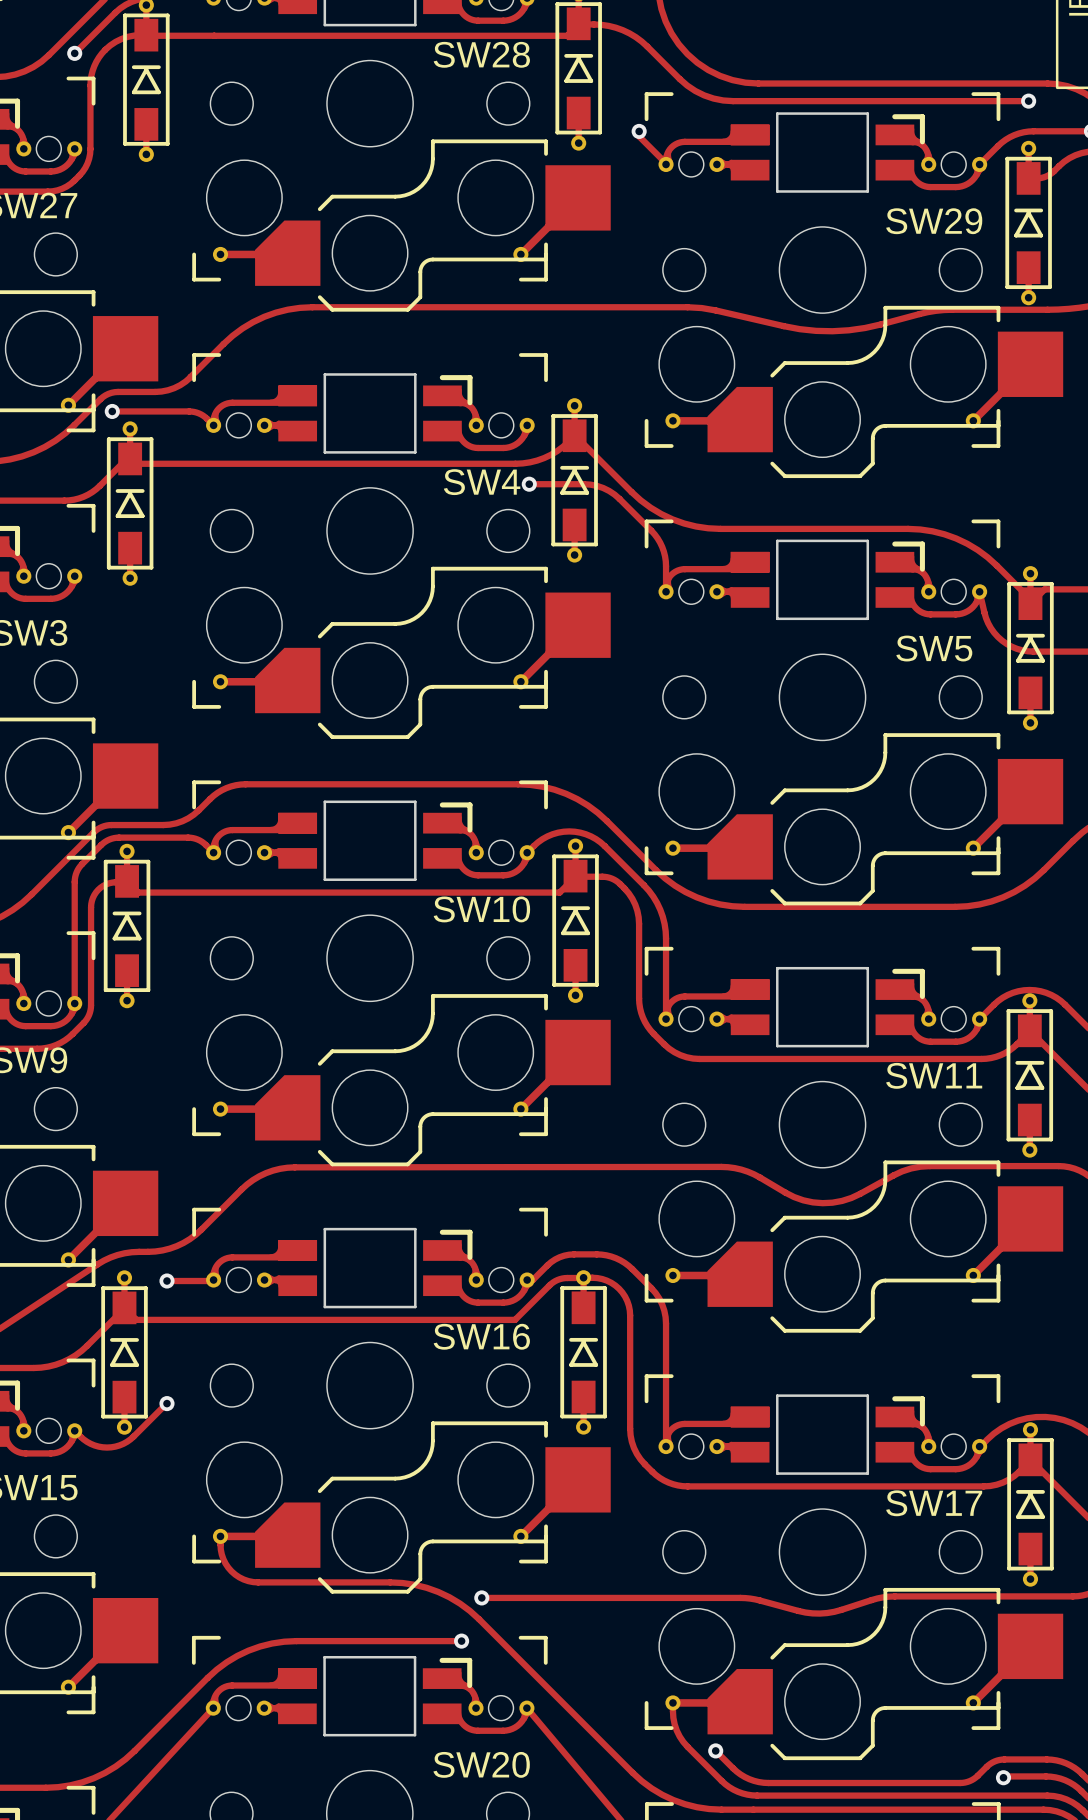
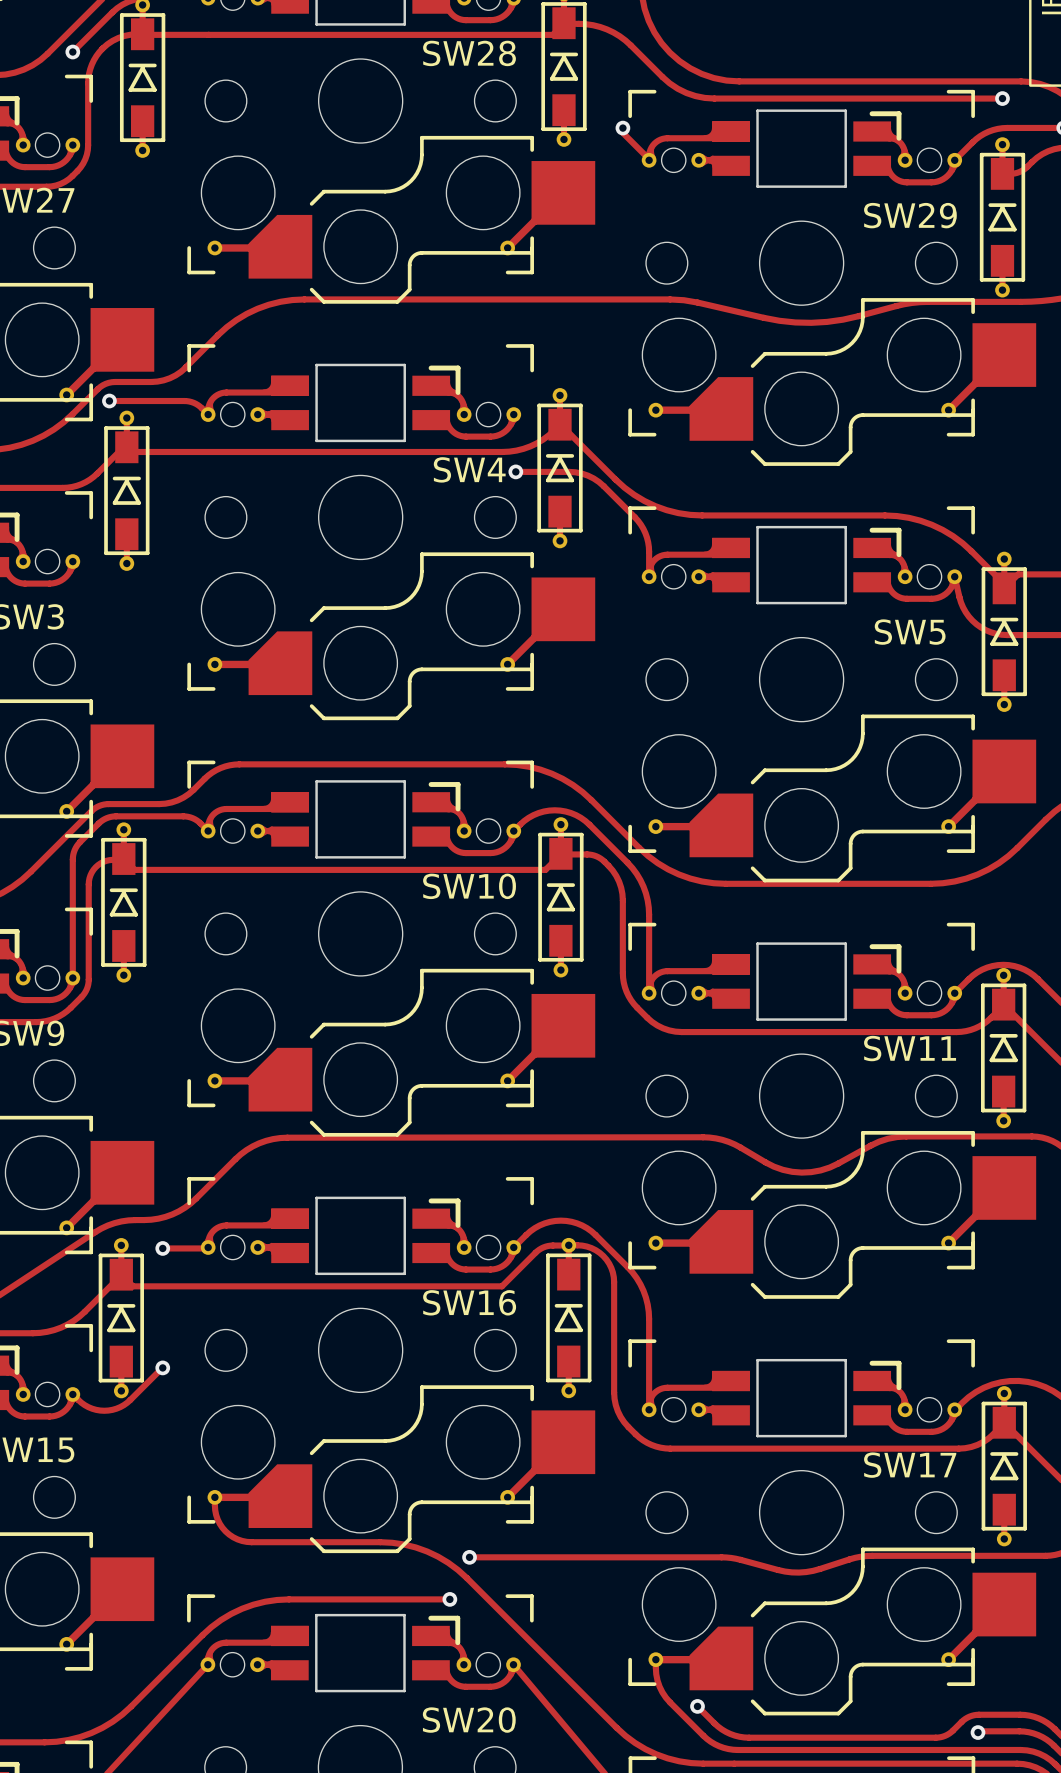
track: (527, 1280) (532, 1280) (551, 1262) (564, 1255) (601, 1254) (620, 1260) (651, 1288) (662, 1304) (665, 1317) (666, 1353) -> (513, 1247) (530, 1231) (544, 1223) (560, 1220) (582, 1225) (595, 1234) (636, 1278) (645, 1297) (649, 1318)

